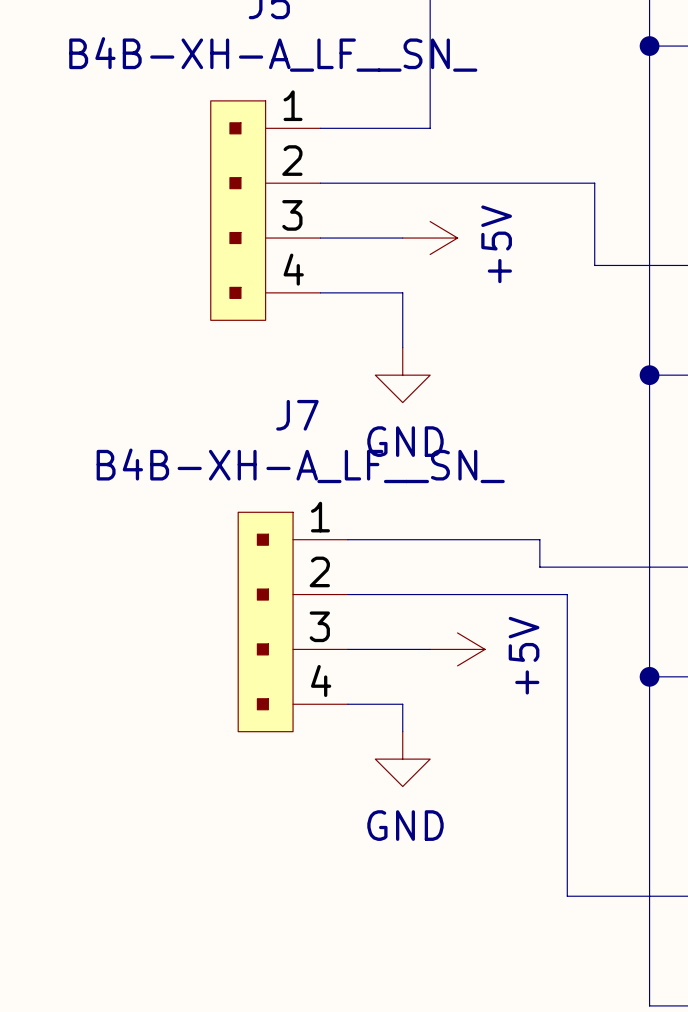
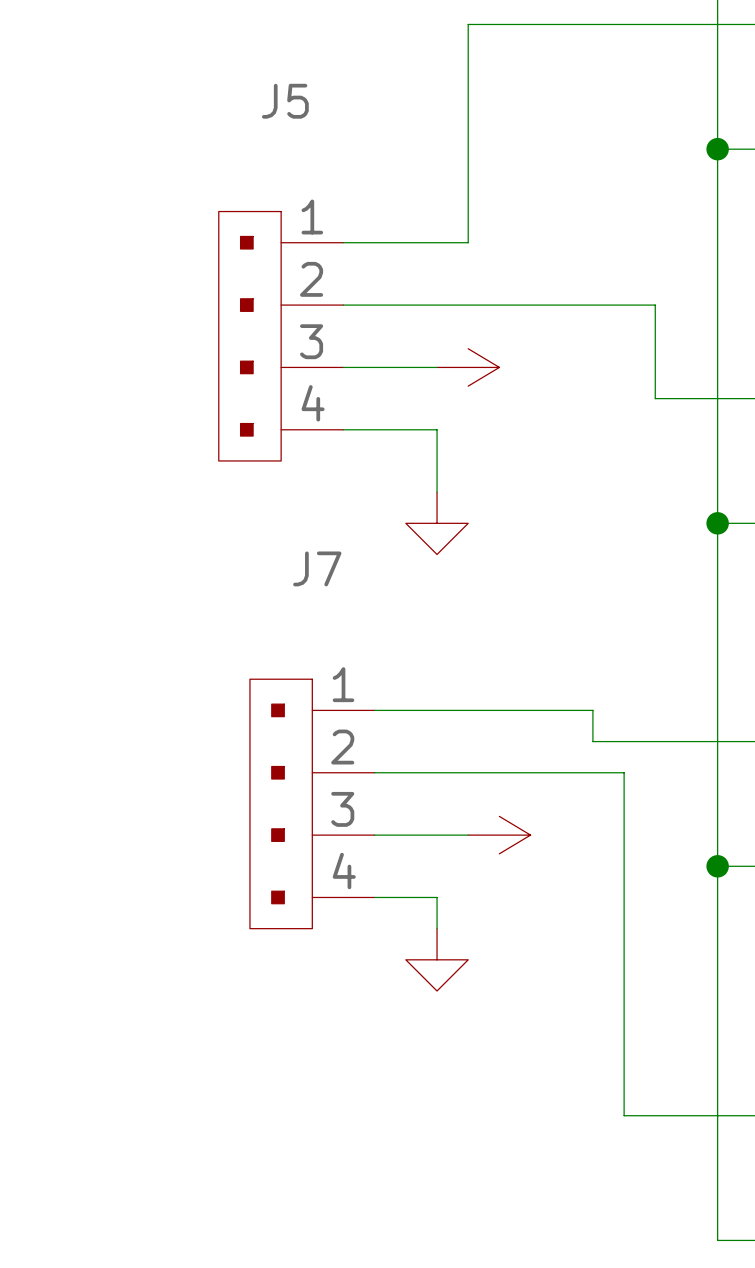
J5 value: B4B-XH-A_LF__SN_ (273, 54) -> none
power symbol text: +5V (496, 244) -> none
power symbol text: GND (405, 441) -> none
J7 value: B4B-XH-A_LF__SN_ (300, 465) -> none
power symbol text: +5V (524, 655) -> none
power symbol text: GND (405, 825) -> none

